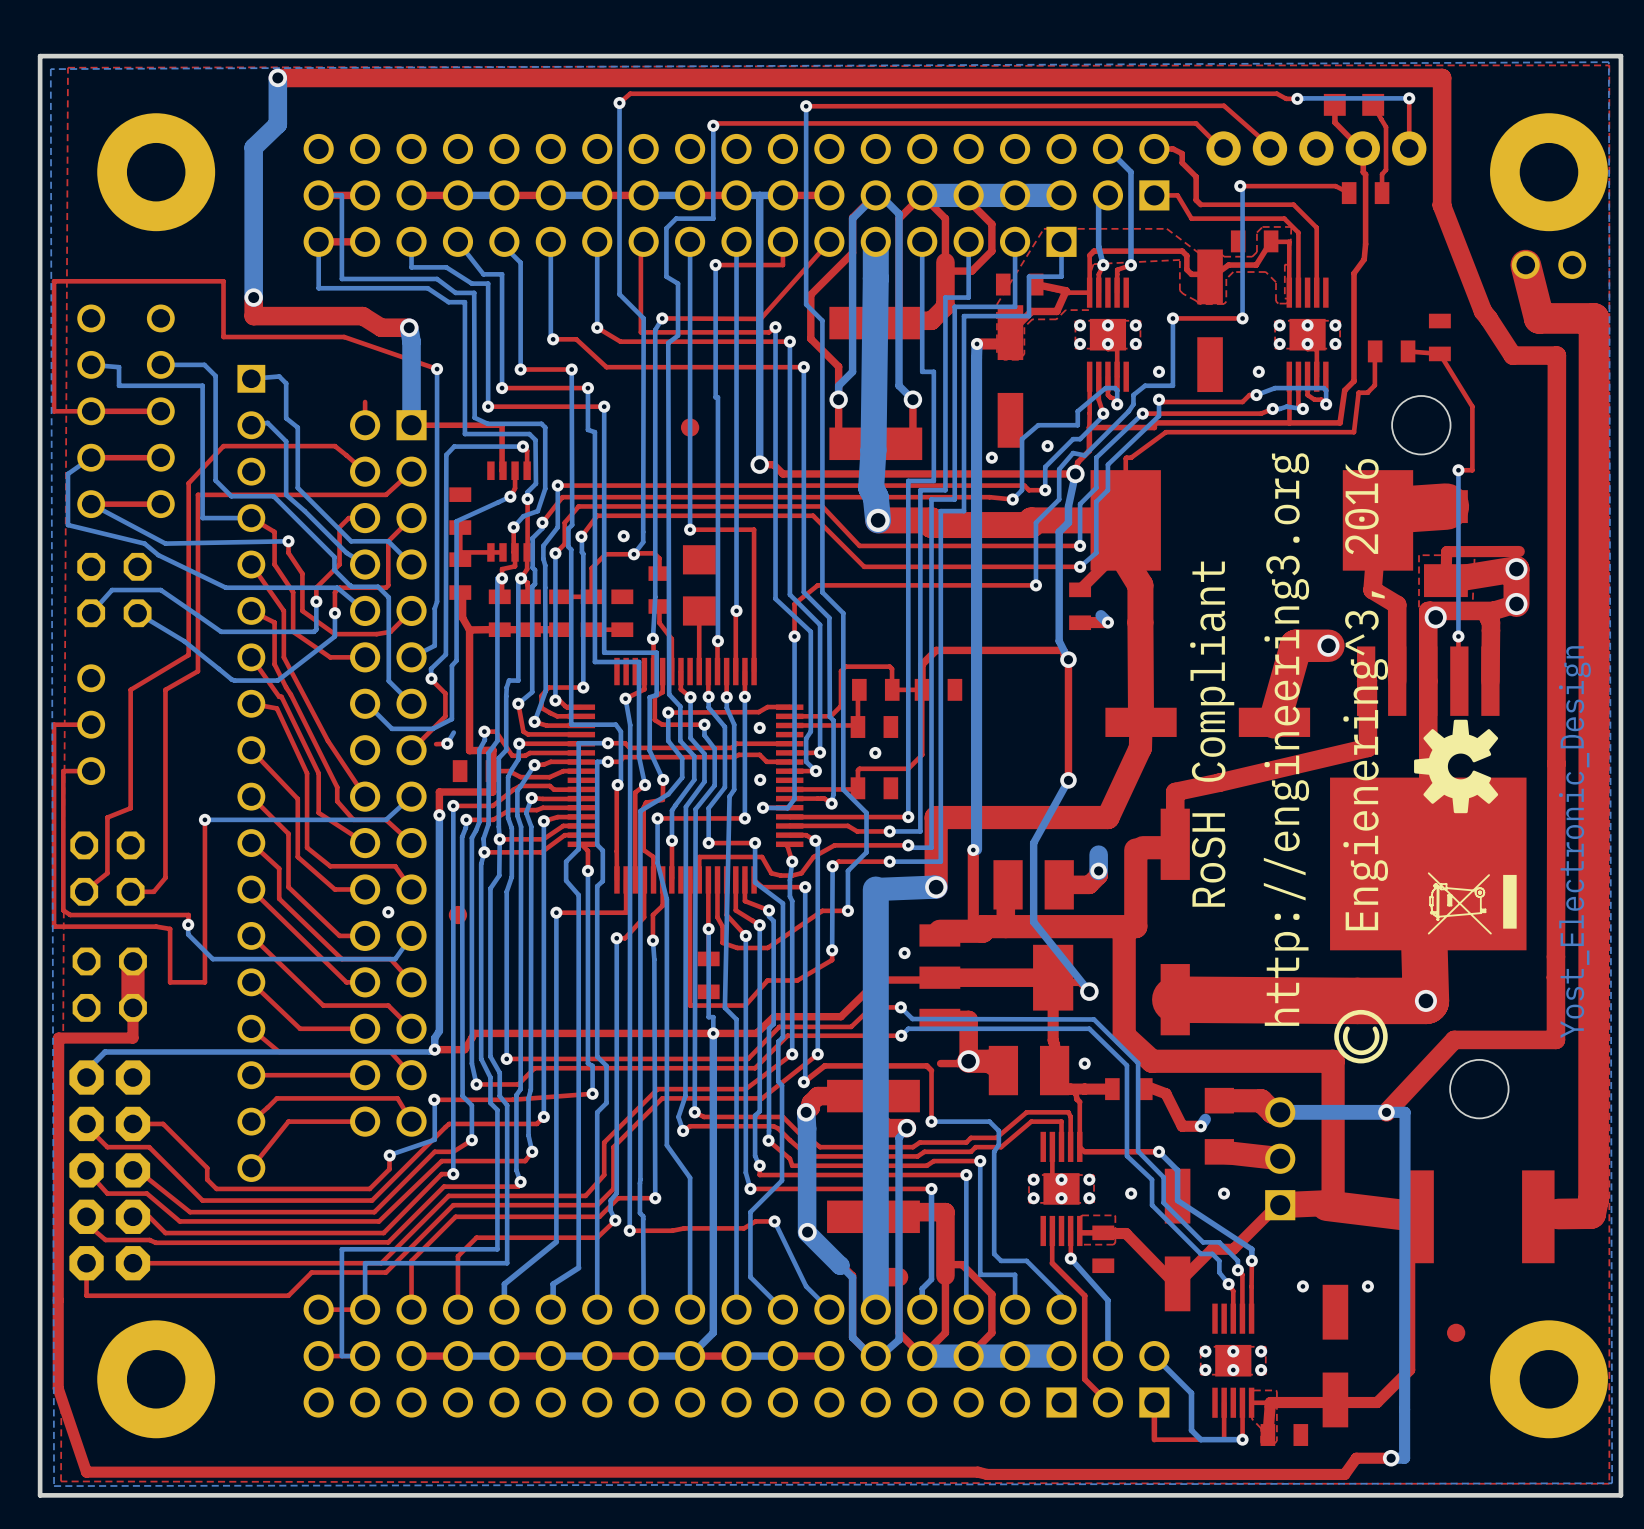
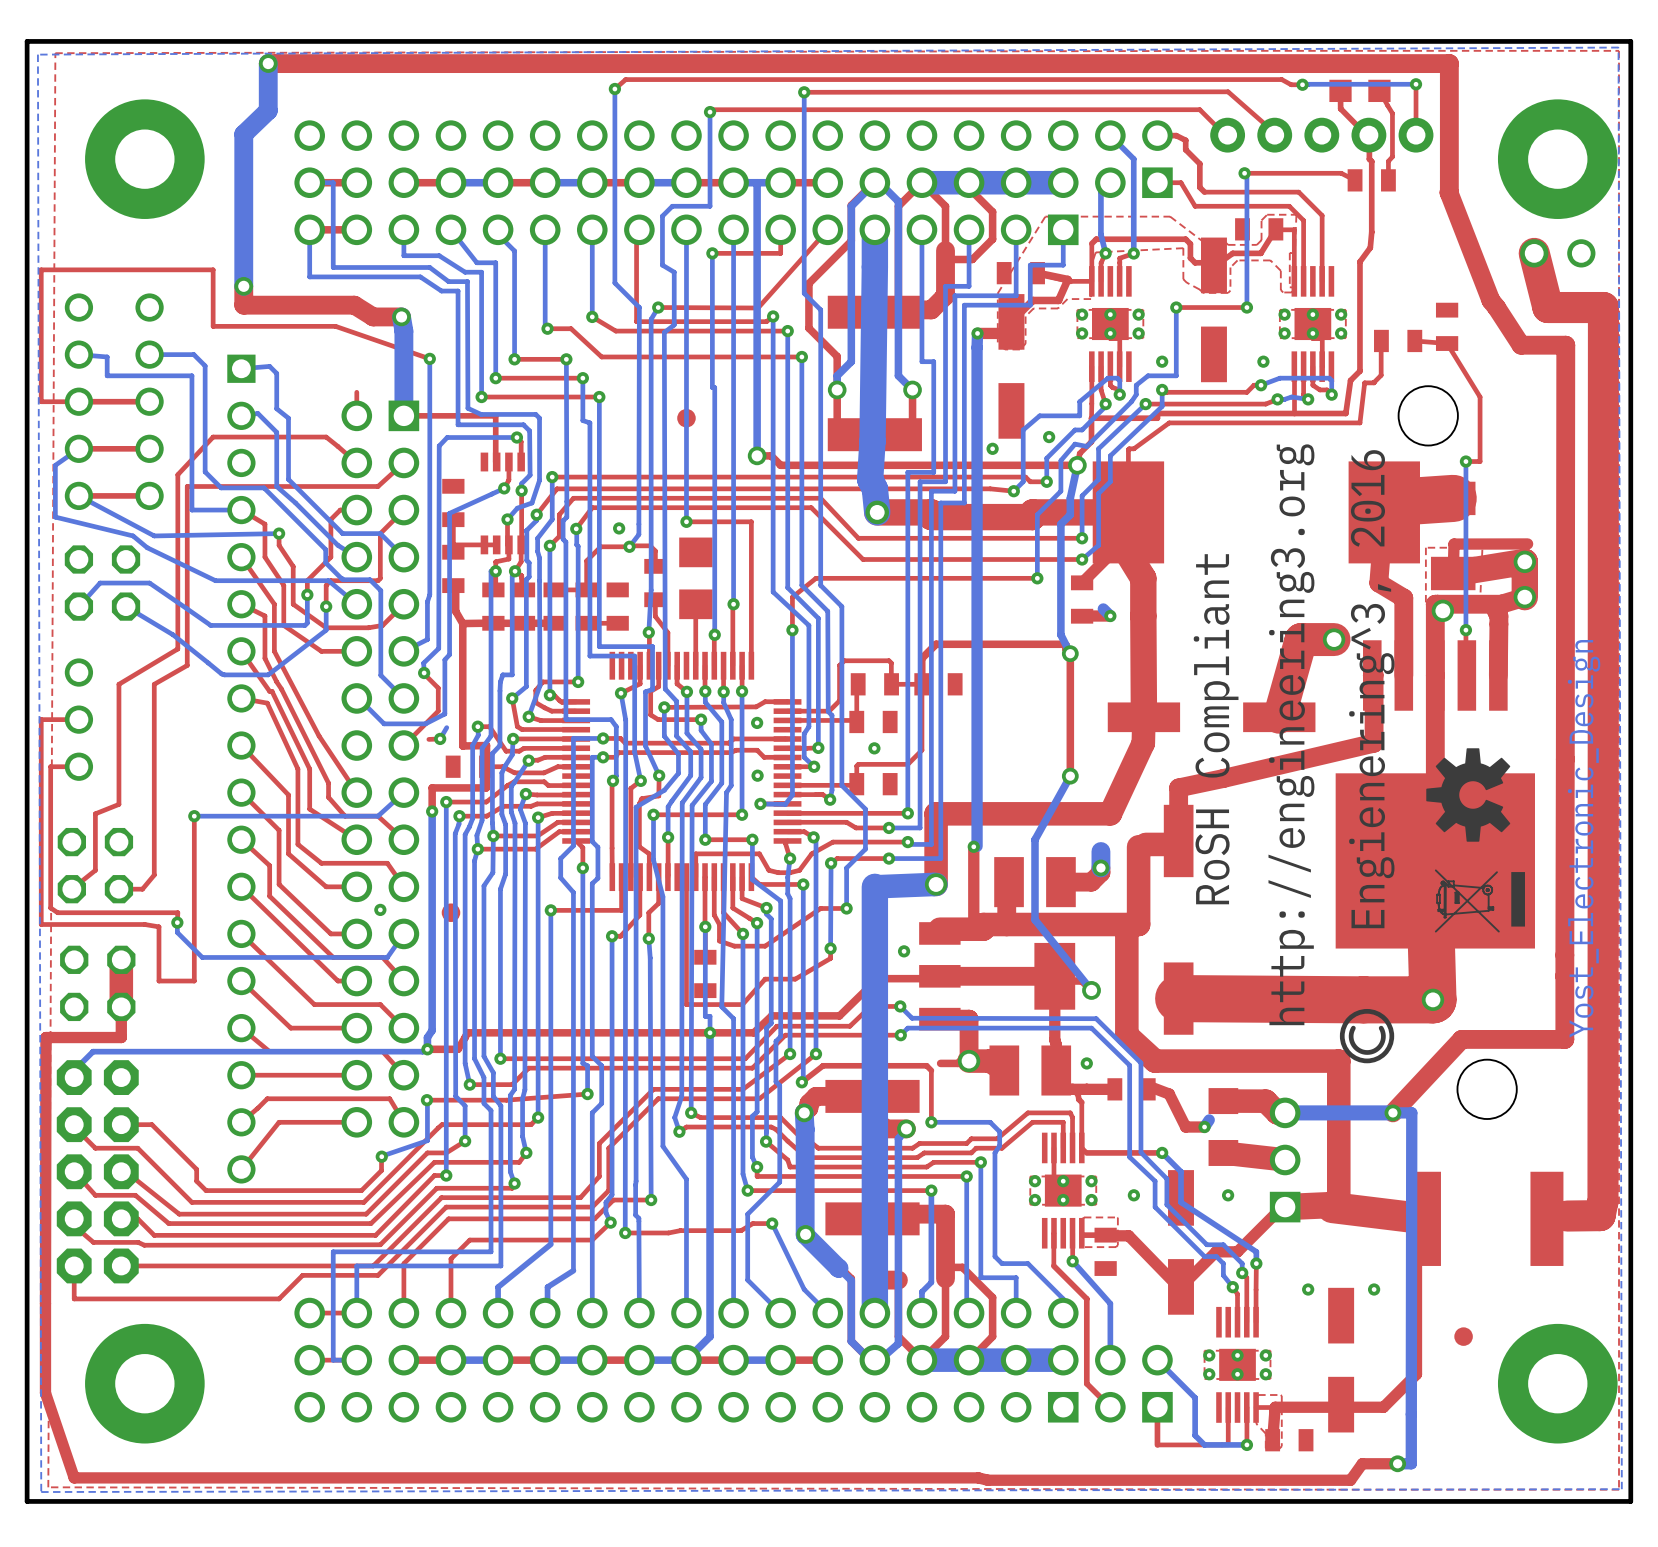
drawing: [1414, 719, 1499, 814] -> none
drawing: none -> [1426, 748, 1511, 842]

